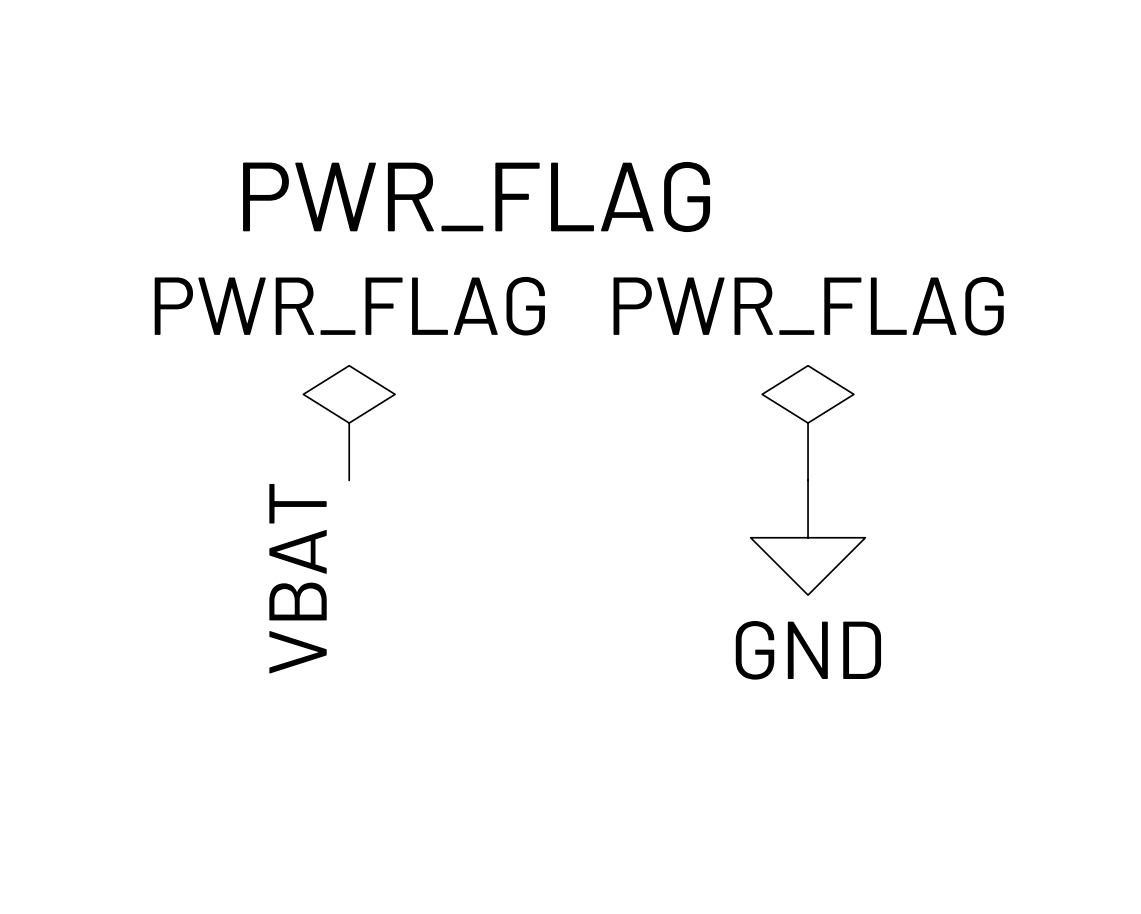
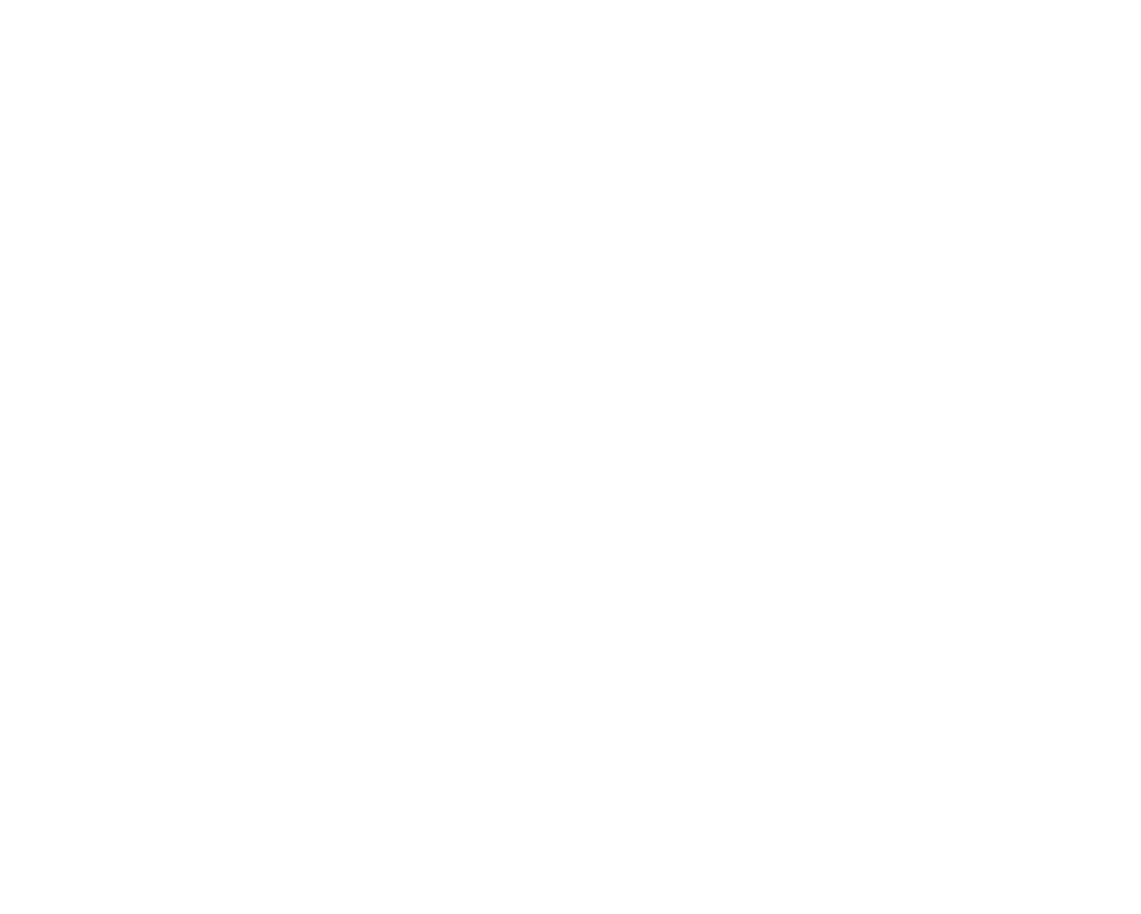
text: PWR_FLAG (476, 196) -> none
power symbol: PWR_FLAG (349, 423) -> none
power symbol: PWR_FLAG (808, 423) -> none
power symbol: GND (808, 537) -> none
label: VBAT (298, 578) -> none

